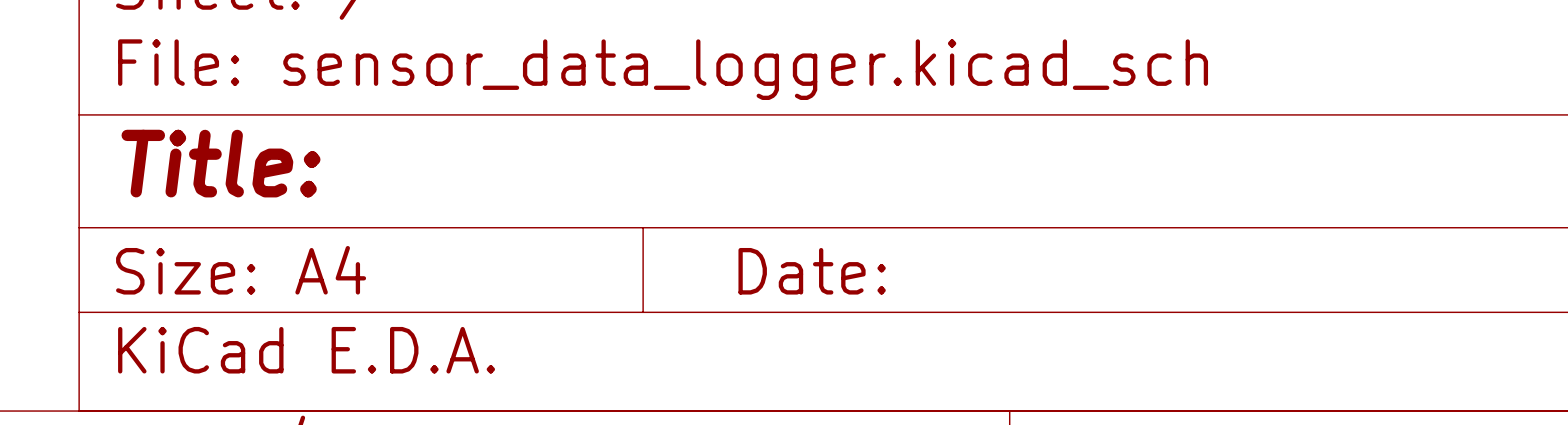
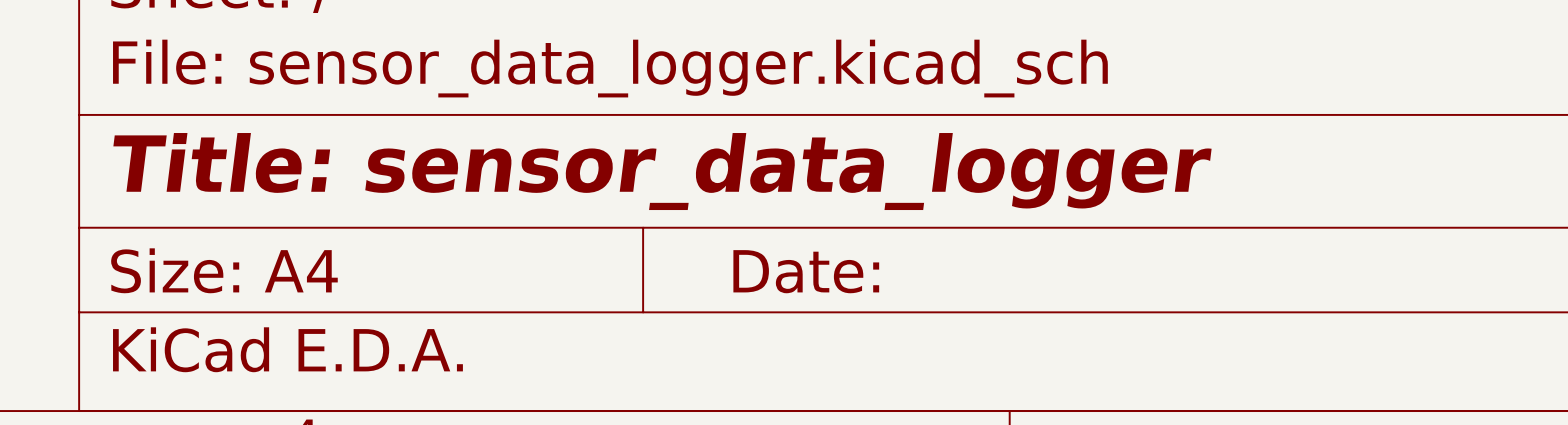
title block: Title: (221, 163) -> Title: sensor_data_logger (662, 171)

